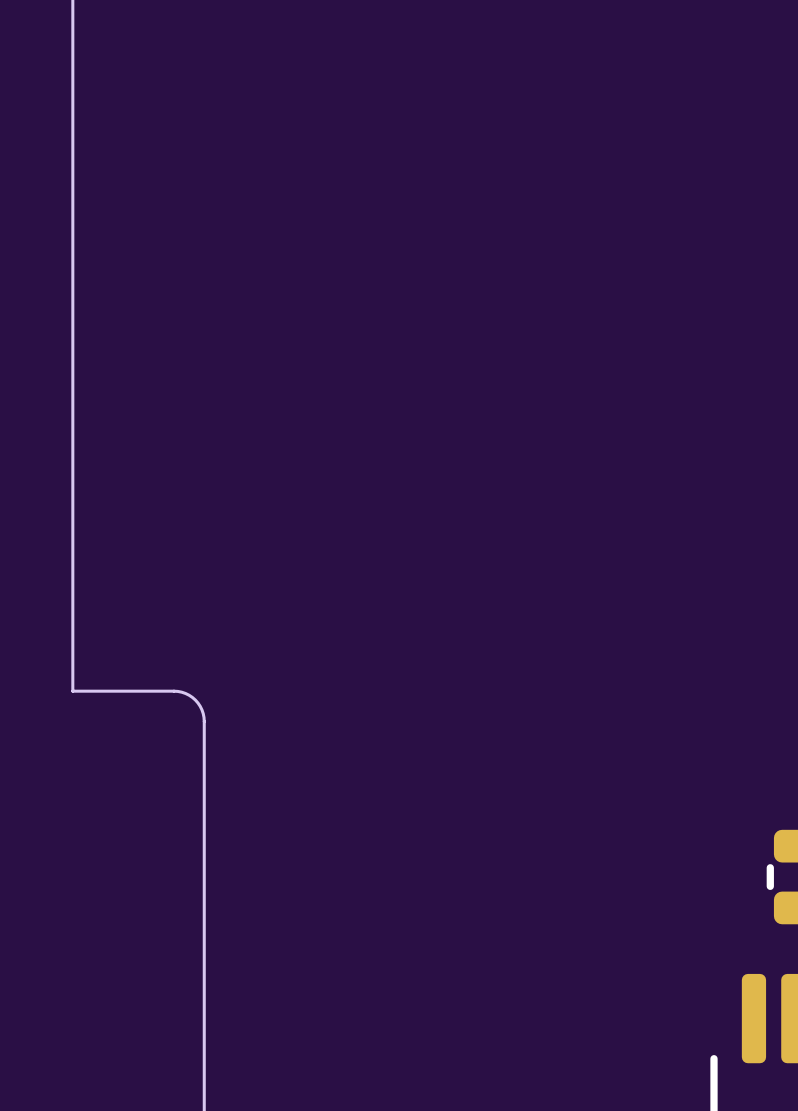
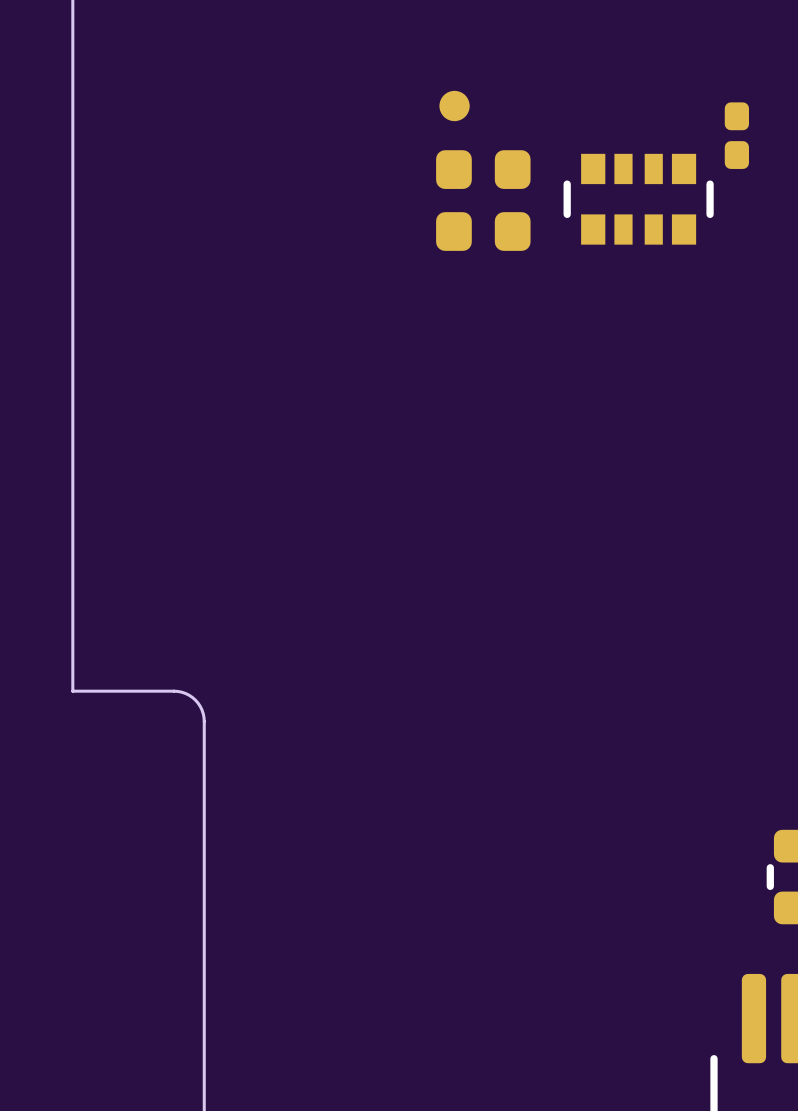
part: none -> (454, 106)
part: none -> (736, 135)
part: none -> (483, 169)
part: none -> (638, 199)
part: none -> (483, 231)

